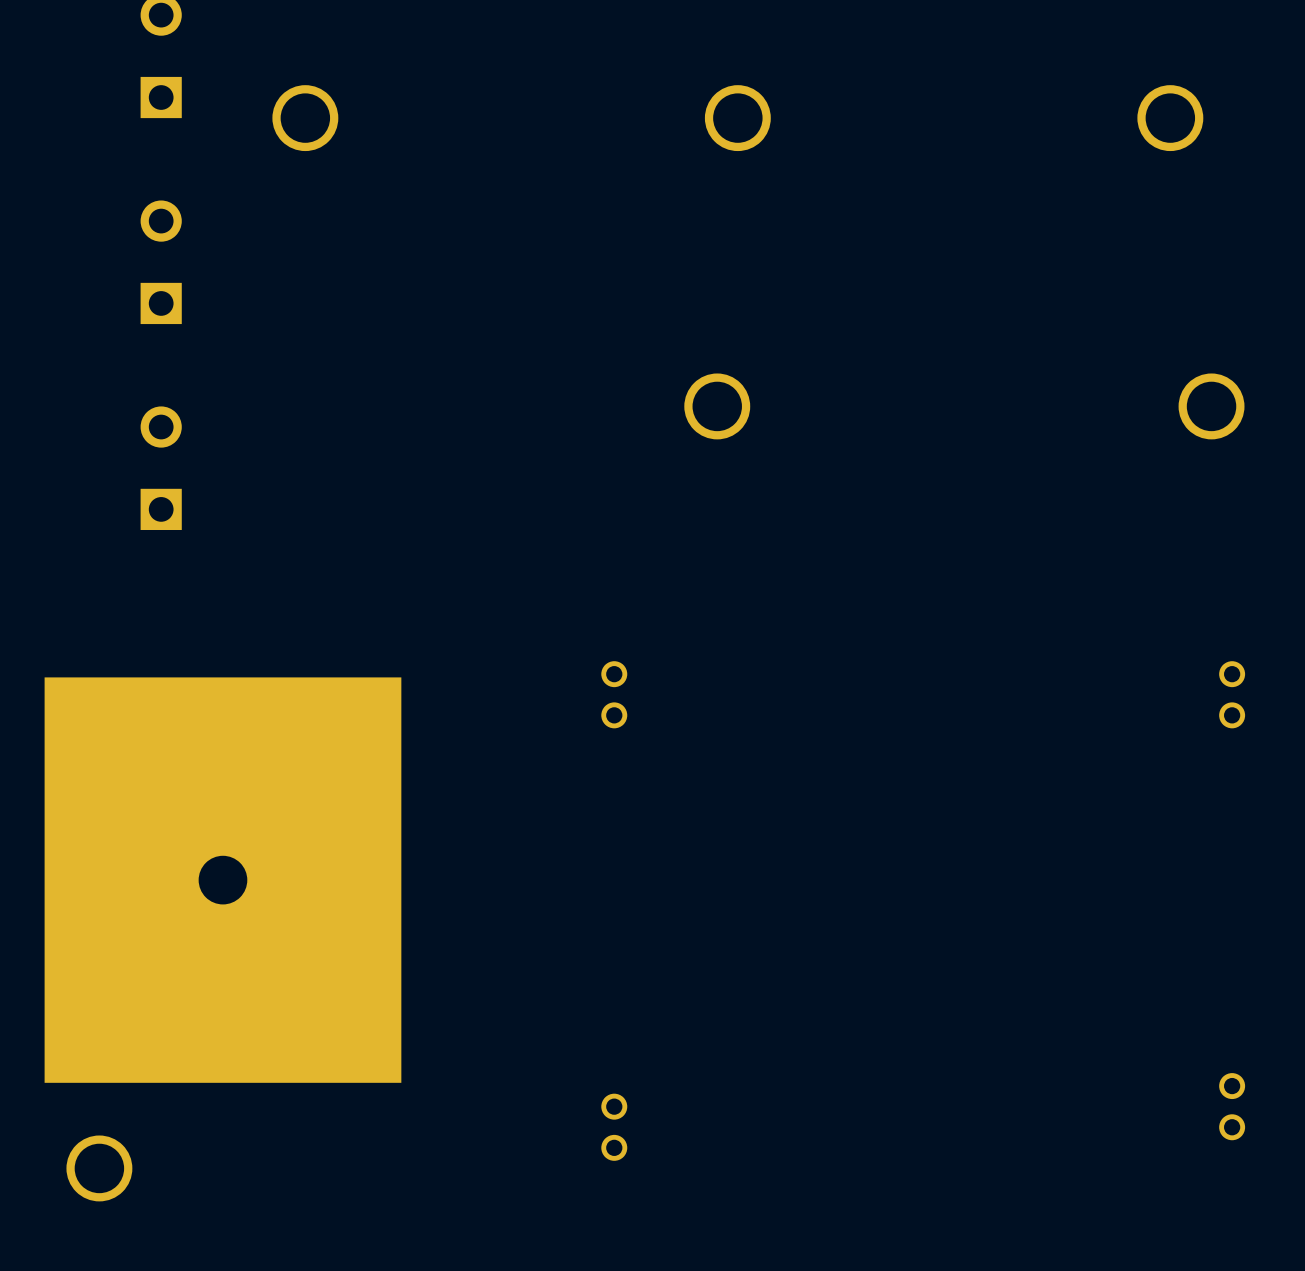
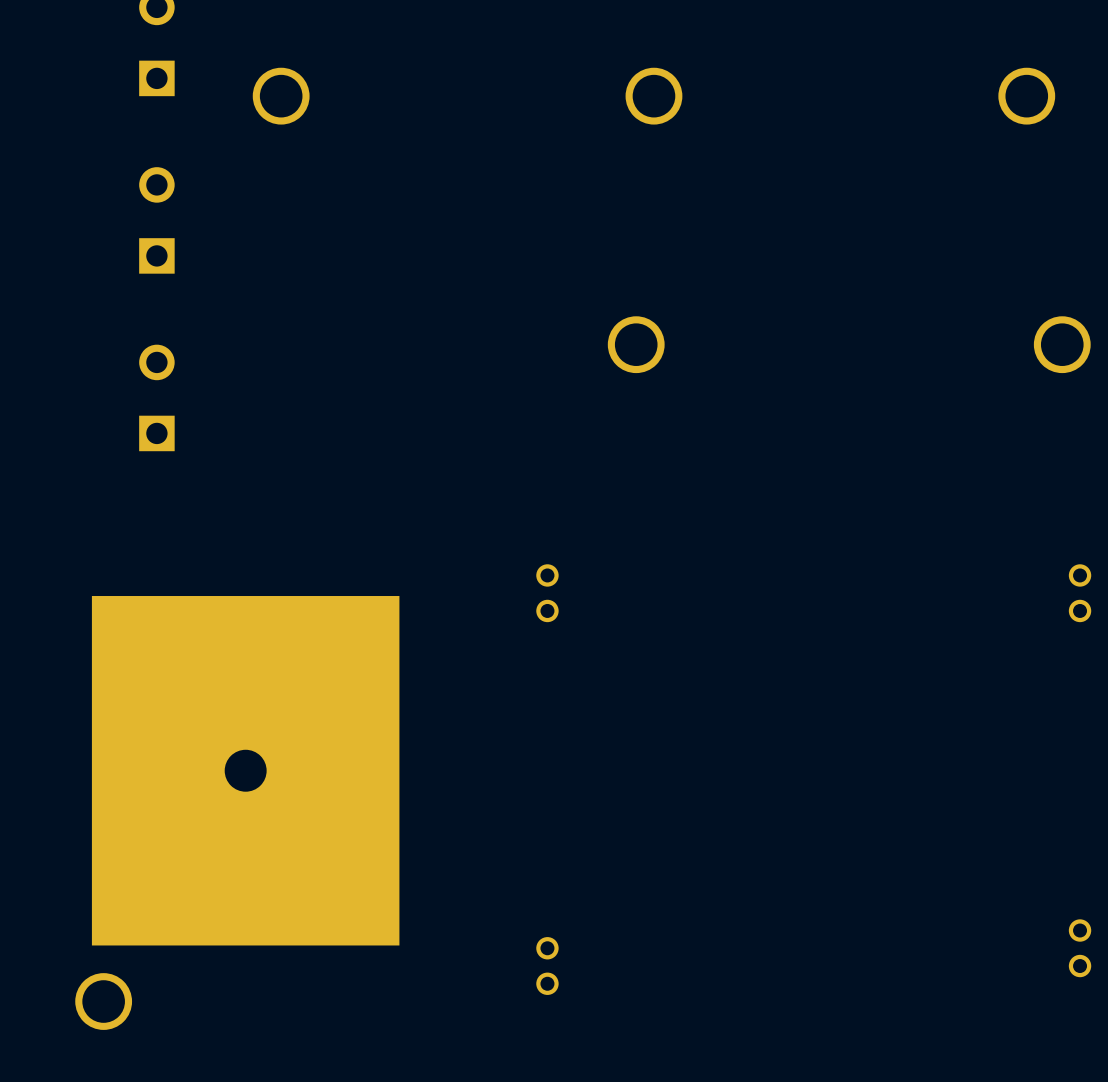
part position: (222, 880) -> (245, 770)

